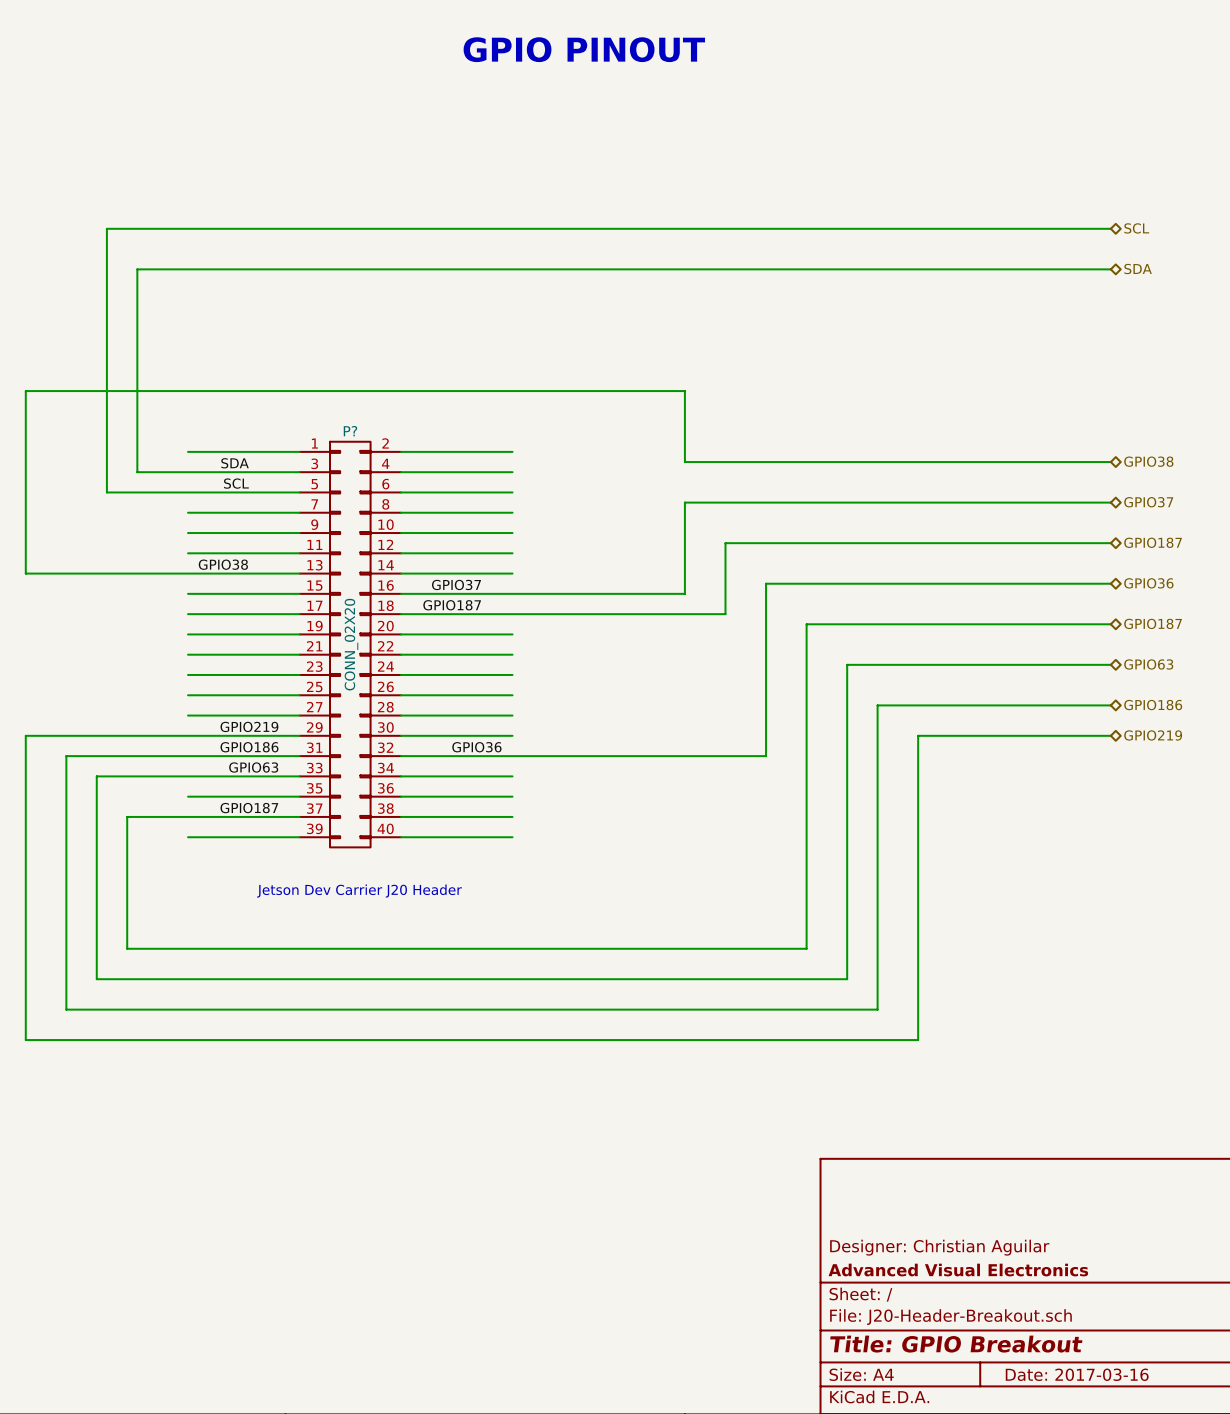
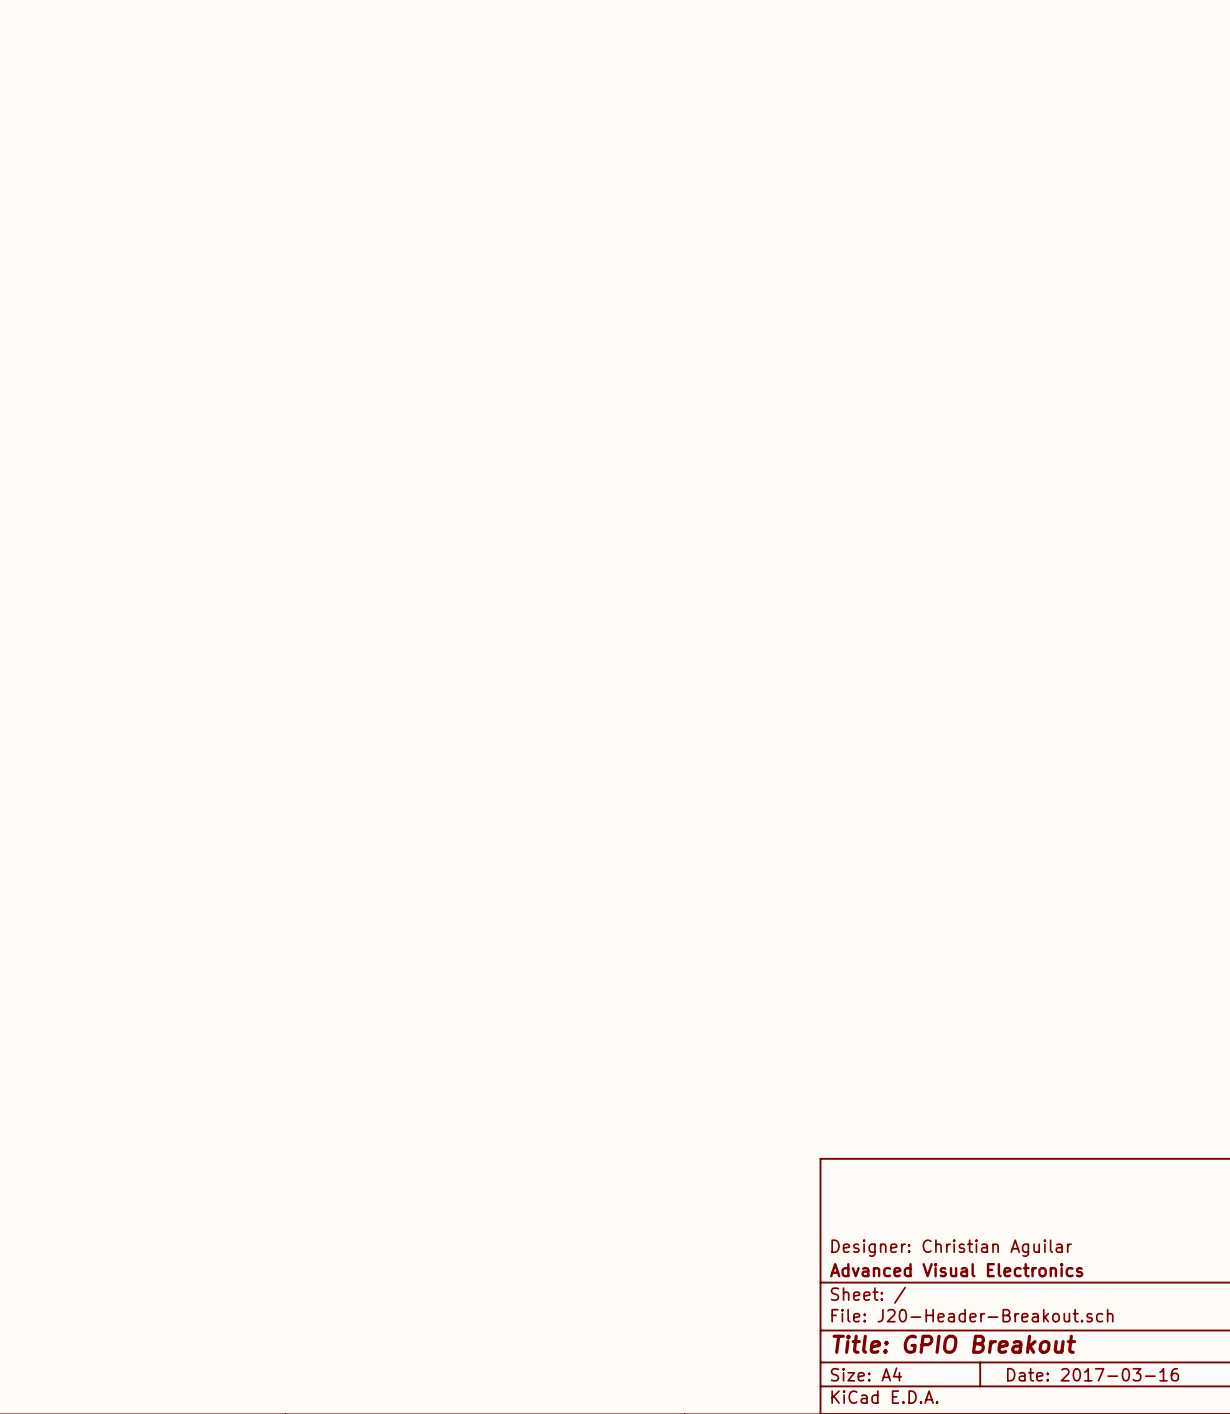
text: GPIO PINOUT (584, 49) -> none
wire: (1110, 228) (106, 228) (106, 492) (299, 492) -> none
hierarchical label: SCL (1136, 228) -> none
wire: (1110, 269) (137, 269) (137, 472) (299, 472) -> none
hierarchical label: SDA (1138, 269) -> none
wire: (188, 451) (299, 451) -> none
wire: (400, 451) (512, 451) -> none
hierarchical label: GPIO38 (1148, 461) -> none
wire: (1110, 462) (684, 462) (684, 391) (25, 391) (25, 573) (299, 573) -> none
label: SDA (235, 463) -> none
wire: (400, 472) (512, 472) -> none
label: SCL (236, 483) -> none
wire: (400, 492) (512, 492) -> none
wire: (1110, 502) (684, 502) (684, 593) (400, 593) -> none
hierarchical label: GPIO37 (1148, 502) -> none
wire: (188, 512) (299, 512) -> none
wire: (400, 512) (512, 512) -> none
wire: (188, 533) (299, 533) -> none
wire: (400, 533) (512, 533) -> none
hierarchical label: GPIO187 (1153, 542) -> none
wire: (1110, 543) (725, 543) (725, 614) (400, 614) -> none
wire: (188, 553) (299, 553) -> none
wire: (400, 553) (512, 553) -> none
label: GPIO38 (223, 564) -> none
wire: (400, 573) (512, 573) -> none
wire: (1110, 583) (766, 583) (766, 756) (400, 756) -> none
hierarchical label: GPIO36 (1148, 583) -> none
label: GPIO37 (456, 584) -> none
wire: (188, 593) (299, 593) -> none
label: GPIO187 (452, 605) -> none
wire: (188, 614) (299, 614) -> none
hierarchical label: GPIO187 (1153, 623) -> none
wire: (1110, 624) (806, 624) (806, 948) (127, 948) (127, 816) (299, 816) -> none
wire: (188, 634) (299, 634) -> none
wire: (400, 634) (512, 634) -> none
P?: CONN_02X20 (350, 644) -> none
wire: (188, 654) (299, 654) -> none
wire: (400, 654) (512, 654) -> none
wire: (1110, 664) (847, 664) (847, 979) (96, 979) (96, 776) (299, 776) -> none
hierarchical label: GPIO63 (1148, 664) -> none
wire: (188, 674) (299, 674) -> none
wire: (400, 674) (512, 674) -> none
wire: (188, 695) (299, 695) -> none
wire: (400, 695) (512, 695) -> none
wire: (1110, 705) (877, 705) (877, 1009) (66, 1009) (66, 756) (299, 756) -> none
hierarchical label: GPIO186 (1153, 705) -> none
wire: (188, 715) (299, 715) -> none
wire: (400, 715) (512, 715) -> none
label: GPIO219 (249, 726) -> none
wire: (299, 735) (25, 735) (25, 1040) (918, 1040) (918, 735) (1110, 735) -> none
wire: (400, 735) (512, 735) -> none
hierarchical label: GPIO219 (1153, 735) -> none
label: GPIO186 (249, 747) -> none
label: GPIO36 (476, 747) -> none
label: GPIO63 (253, 767) -> none
wire: (400, 776) (512, 776) -> none
wire: (188, 796) (299, 796) -> none
wire: (400, 796) (512, 796) -> none
label: GPIO187 (249, 808) -> none
wire: (400, 816) (512, 816) -> none
wire: (188, 837) (299, 837) -> none
wire: (400, 837) (512, 837) -> none
text: Jetson Dev Carrier J20 Header (359, 891) -> none

